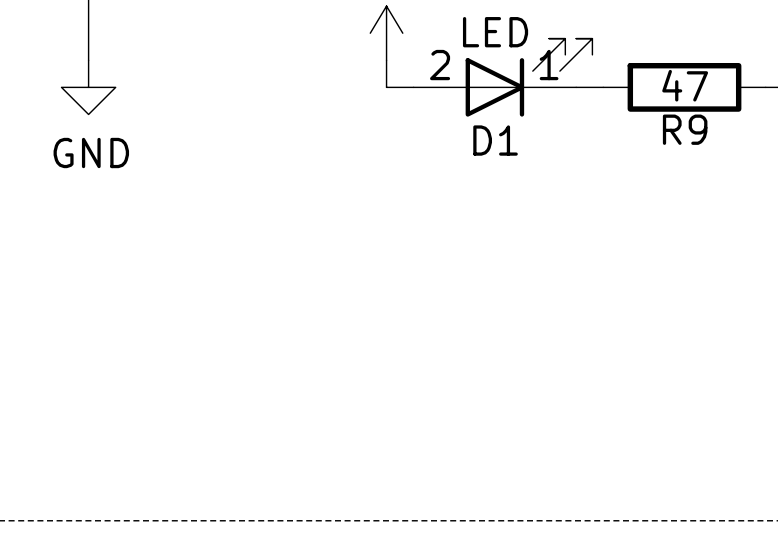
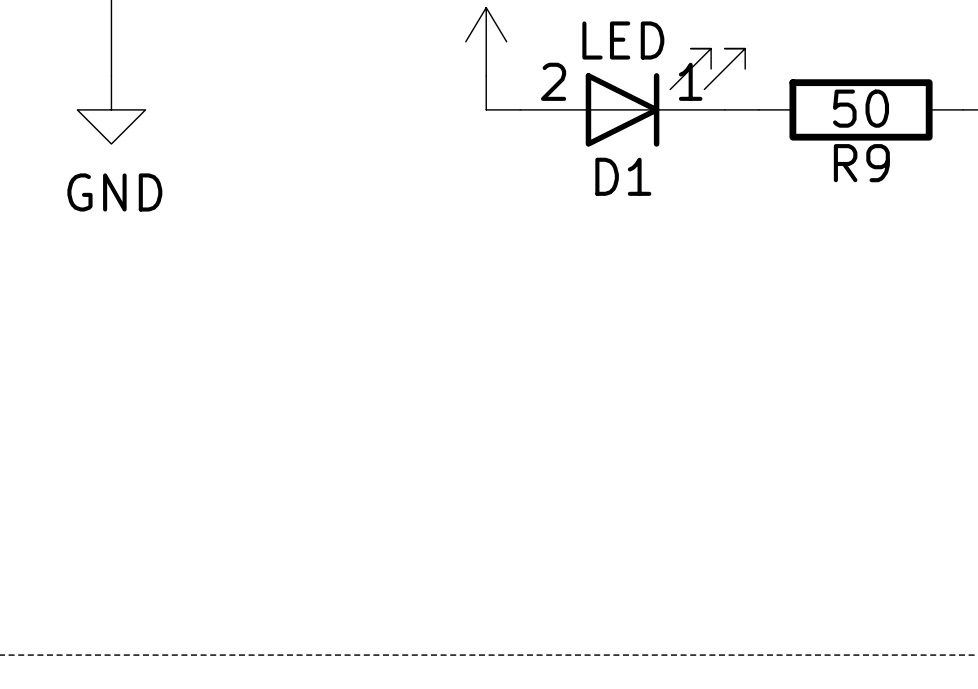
R9 value: 47 (685, 85) -> 50 (861, 108)

